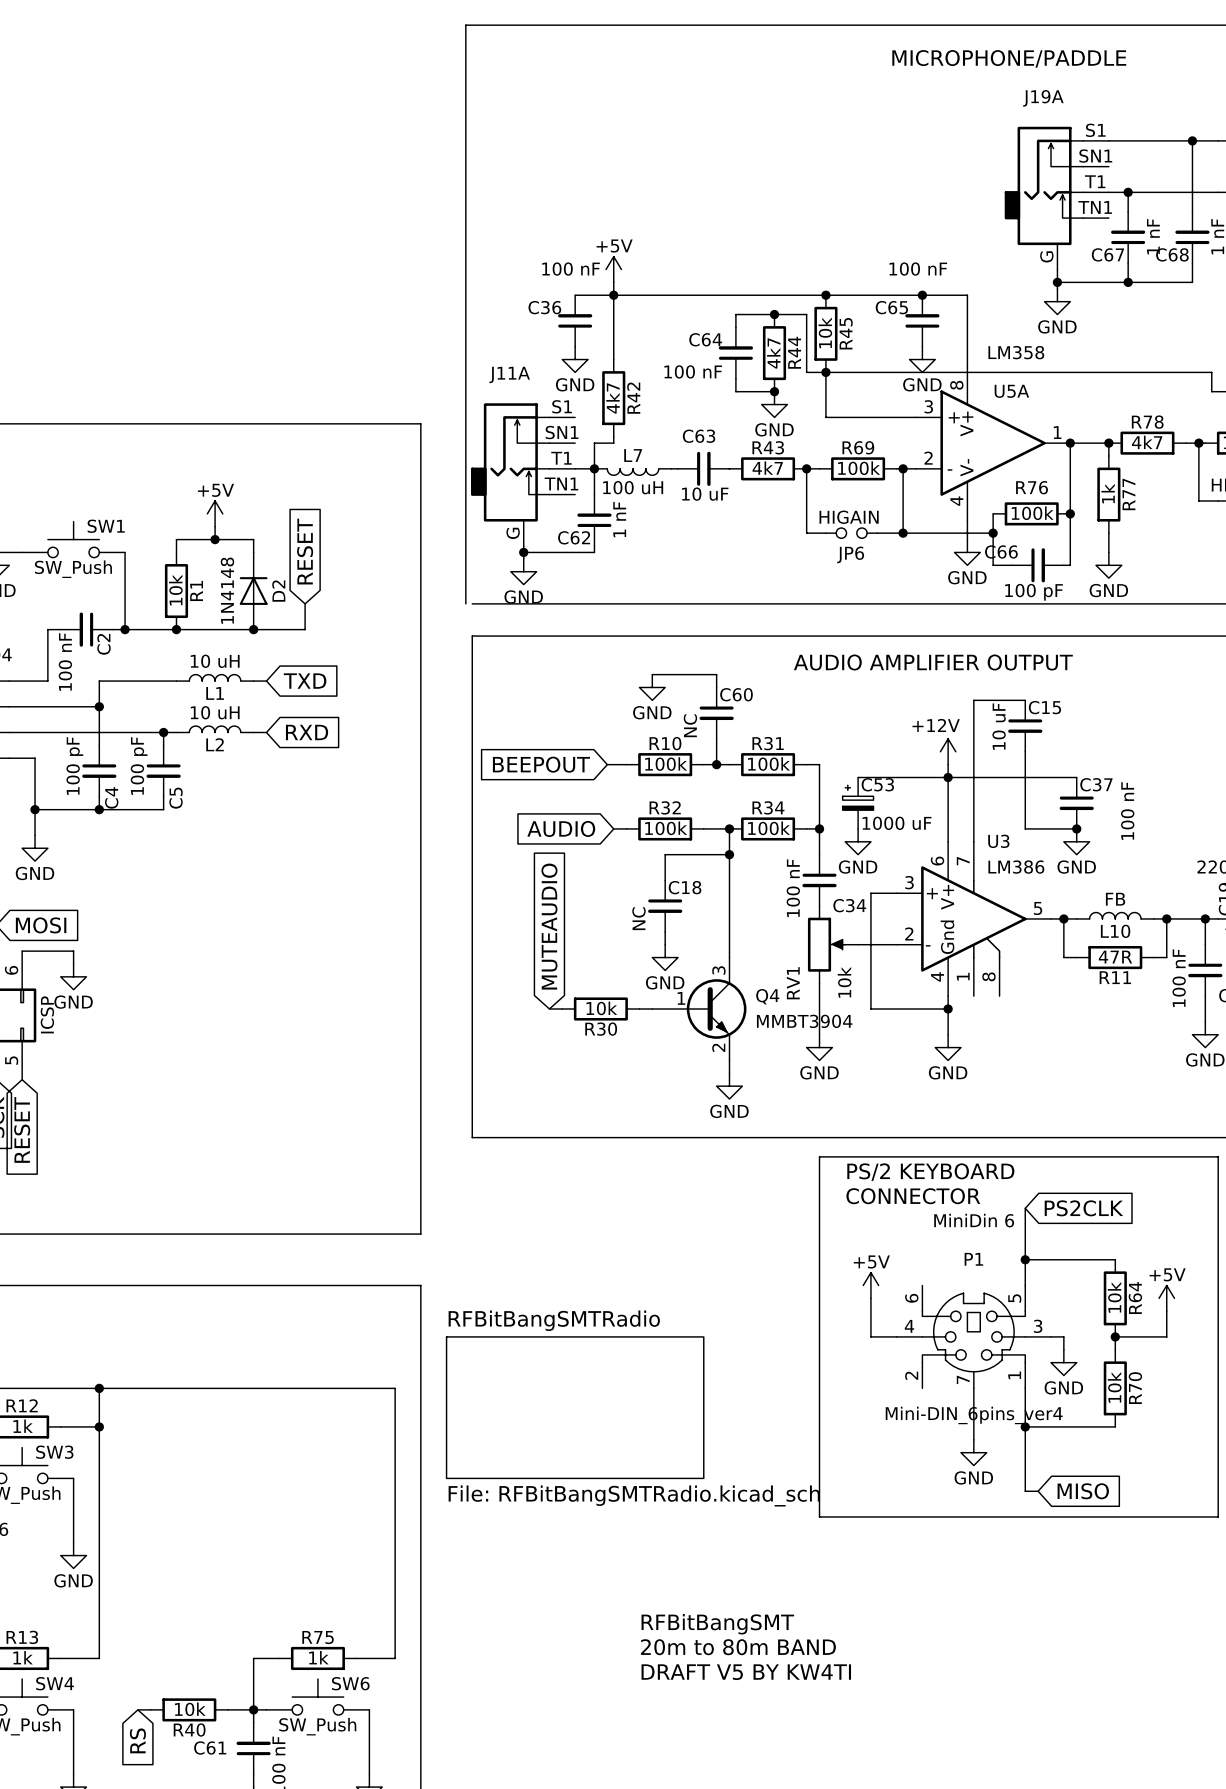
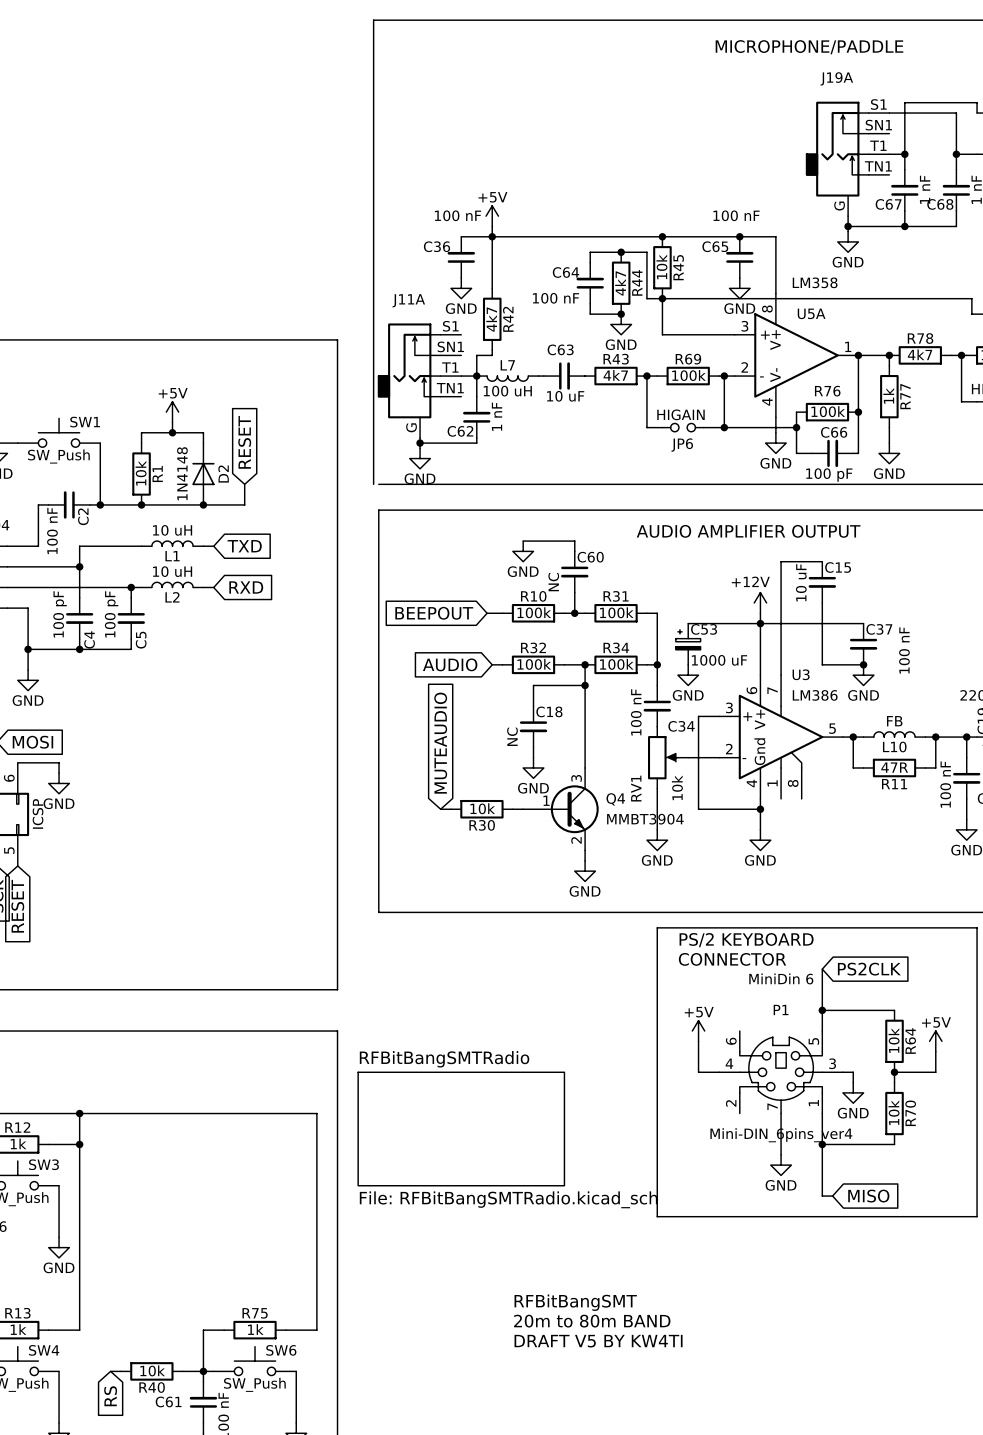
wire: (1192, 140) (1218, 140) -> none
junction position: (1192, 140) -> (956, 154)
wire: (1128, 192) (1192, 192) -> (904, 154) (904, 102) (977, 102) (977, 113)
C66 name position: C66 (1001, 551) -> C66 (834, 432)

